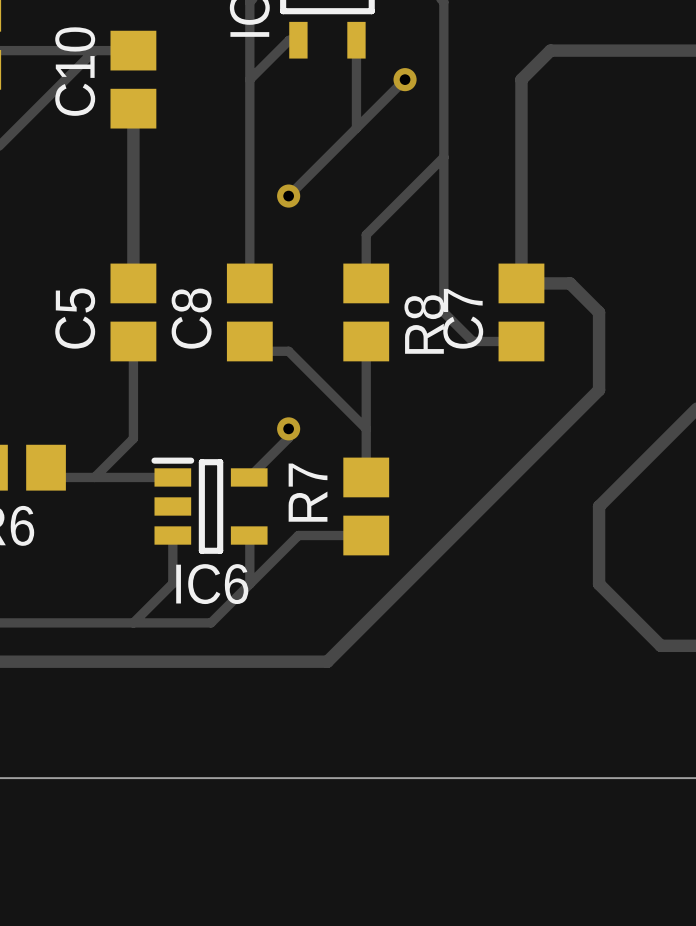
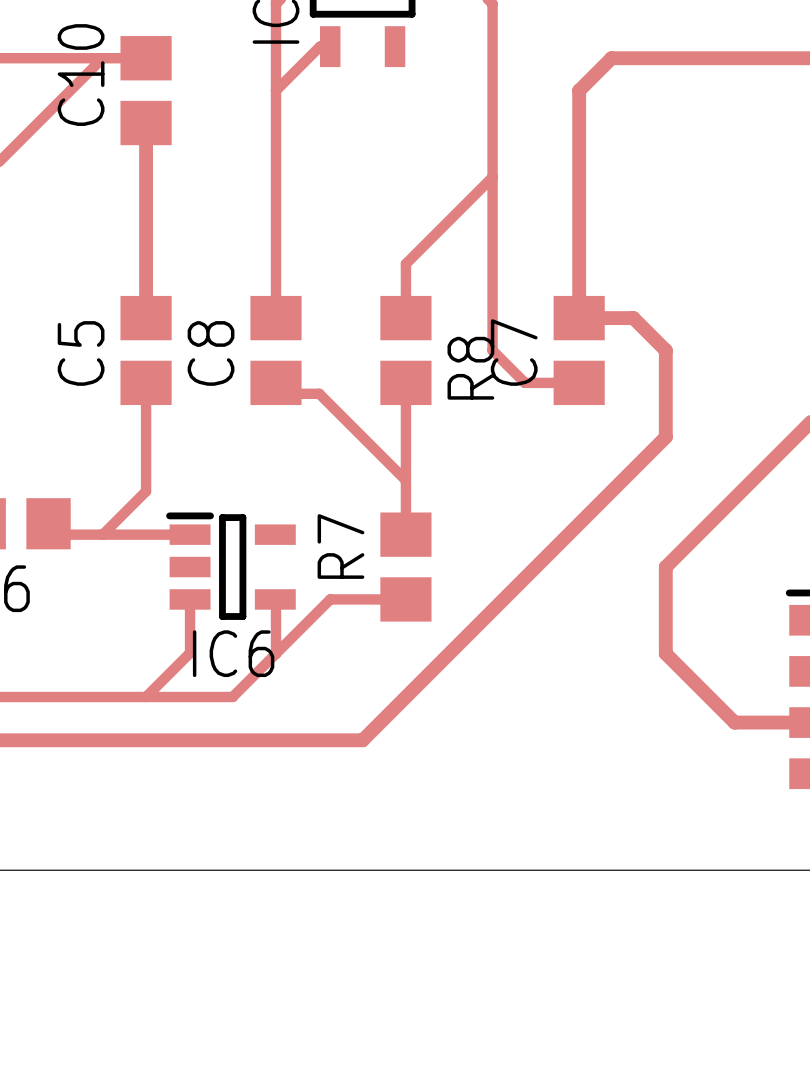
track: (356, 40) (356, 128) -> none
track: (405, 79) (288, 196) -> none
via: (405, 79) -> none
via: (288, 196) -> none
track: (288, 428) (288, 438) (249, 477) -> none
via: (288, 428) -> none

